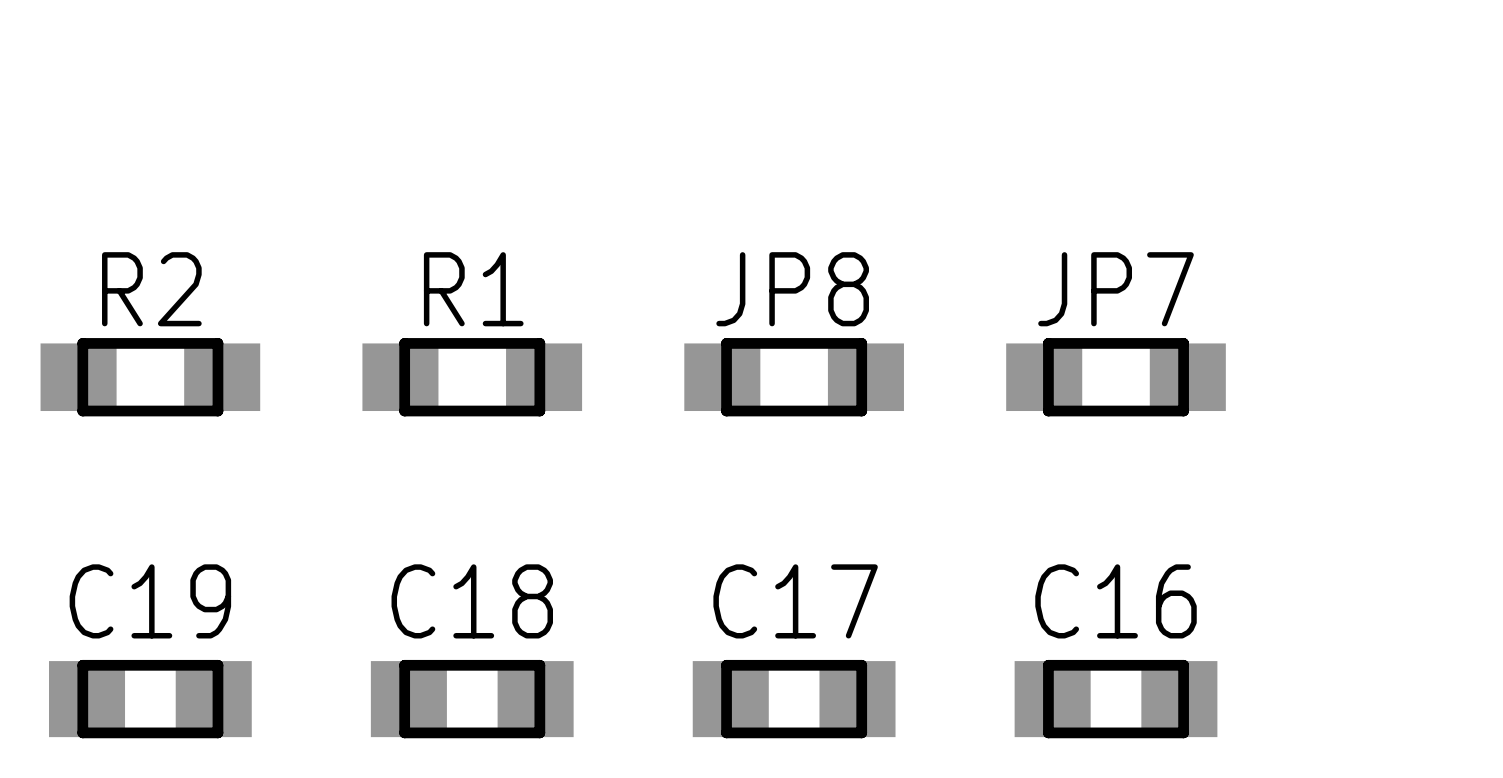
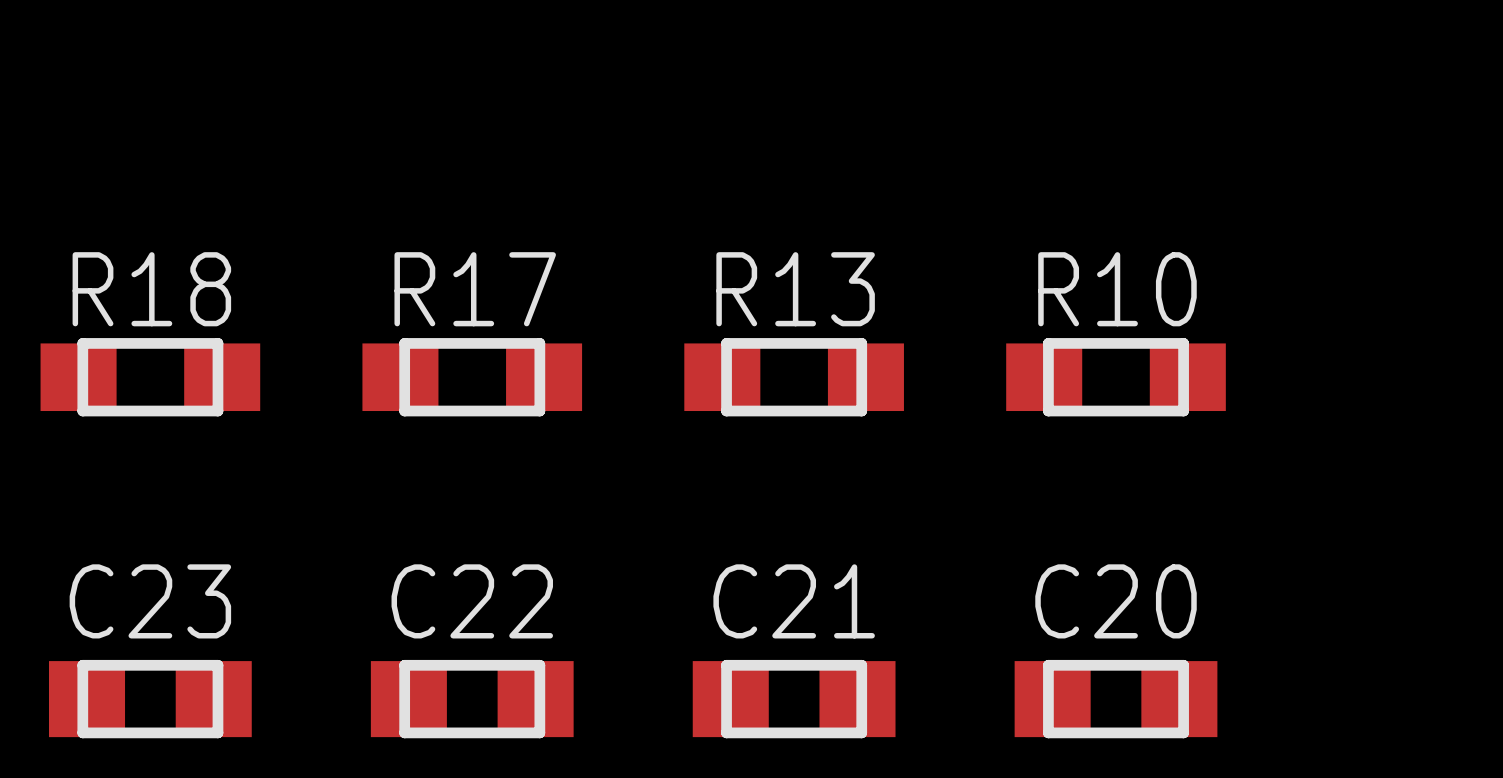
R2 name: R2 (151, 289) -> R18 (151, 289)
R1 name: R1 (473, 289) -> R17 (475, 289)
JP8 name: JP8 (792, 289) -> R13 (795, 289)
JP7 name: JP7 (1116, 289) -> R10 (1117, 289)
C19 name: C19 (150, 601) -> C23 (150, 601)
C18 name: C18 (472, 601) -> C22 (472, 601)
C17 name: C17 (795, 601) -> C21 (794, 601)
C16 name: C16 (1116, 601) -> C20 (1116, 601)

